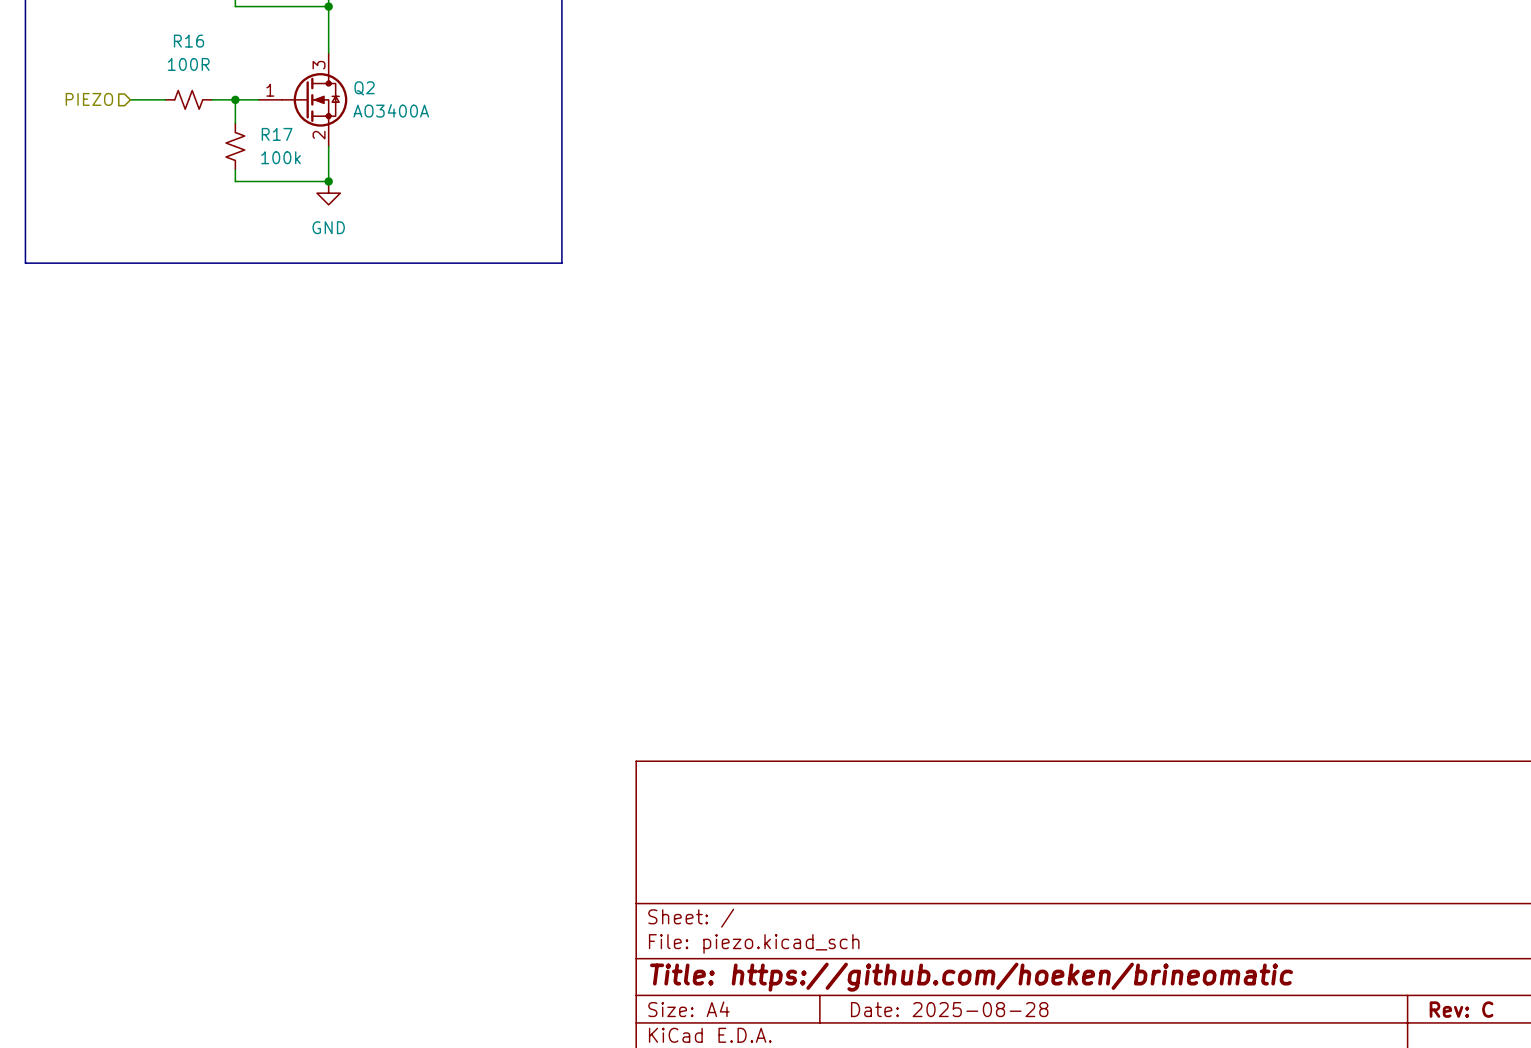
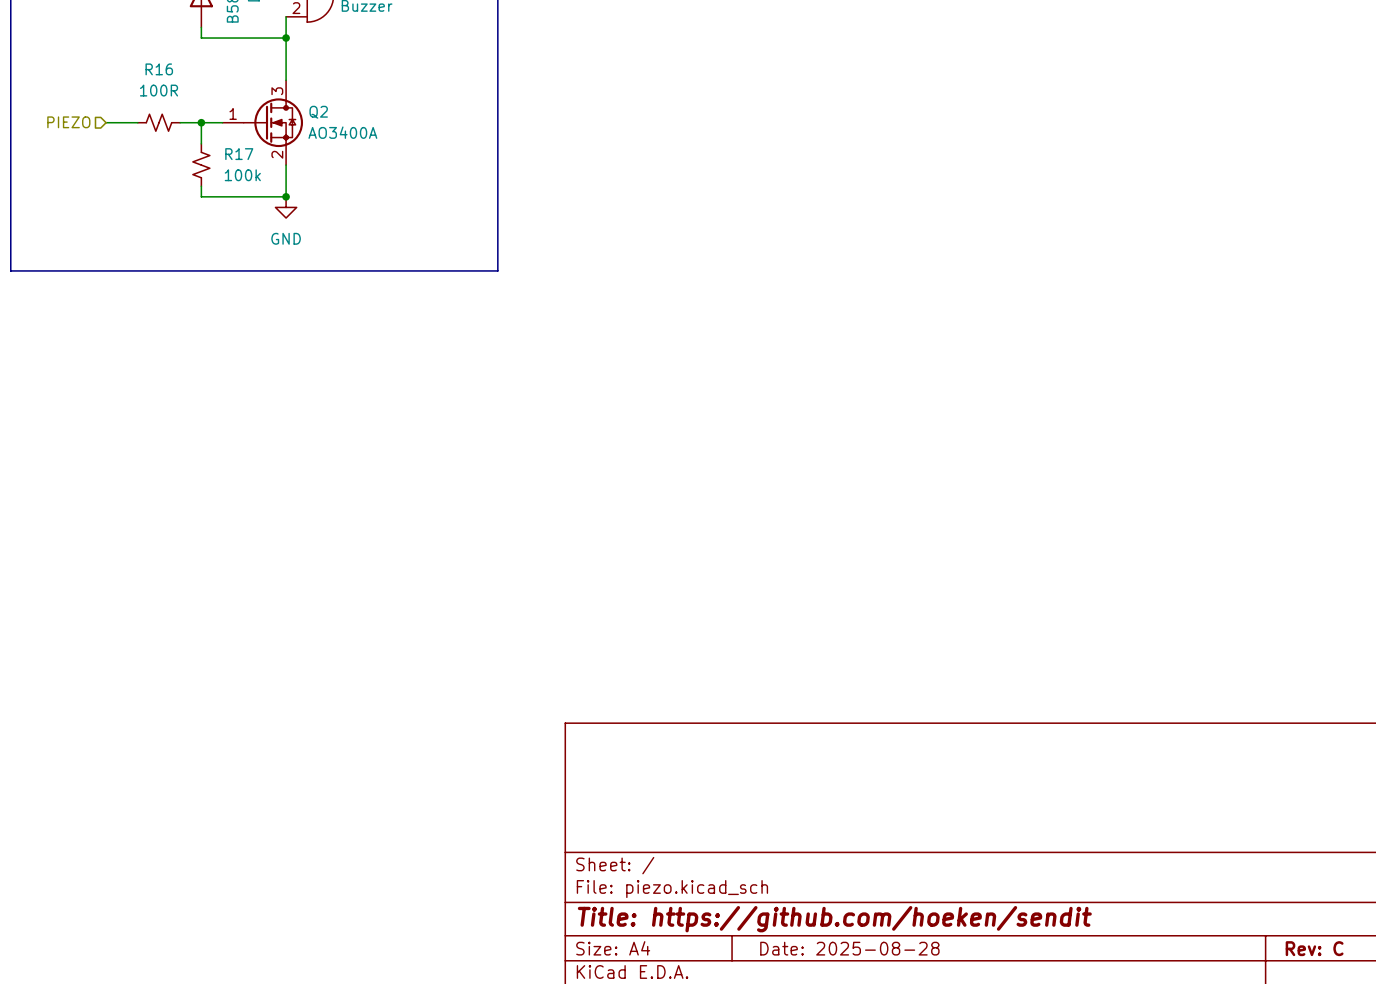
title block: Title: https://github.com/hoeken/brineomatic (971, 977) -> Title: https://github.com/hoeken/sendit (834, 919)

